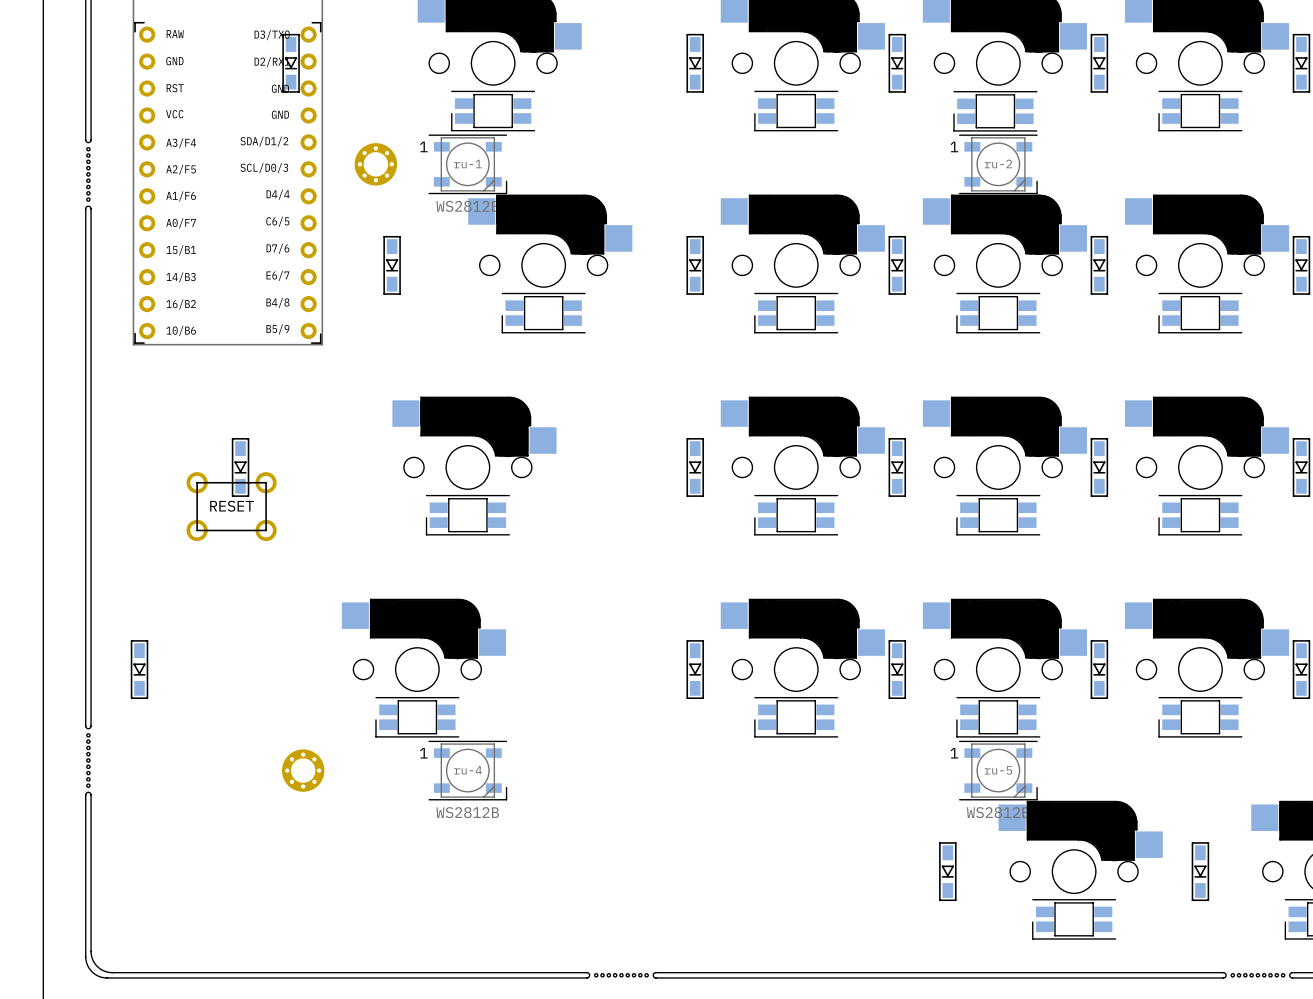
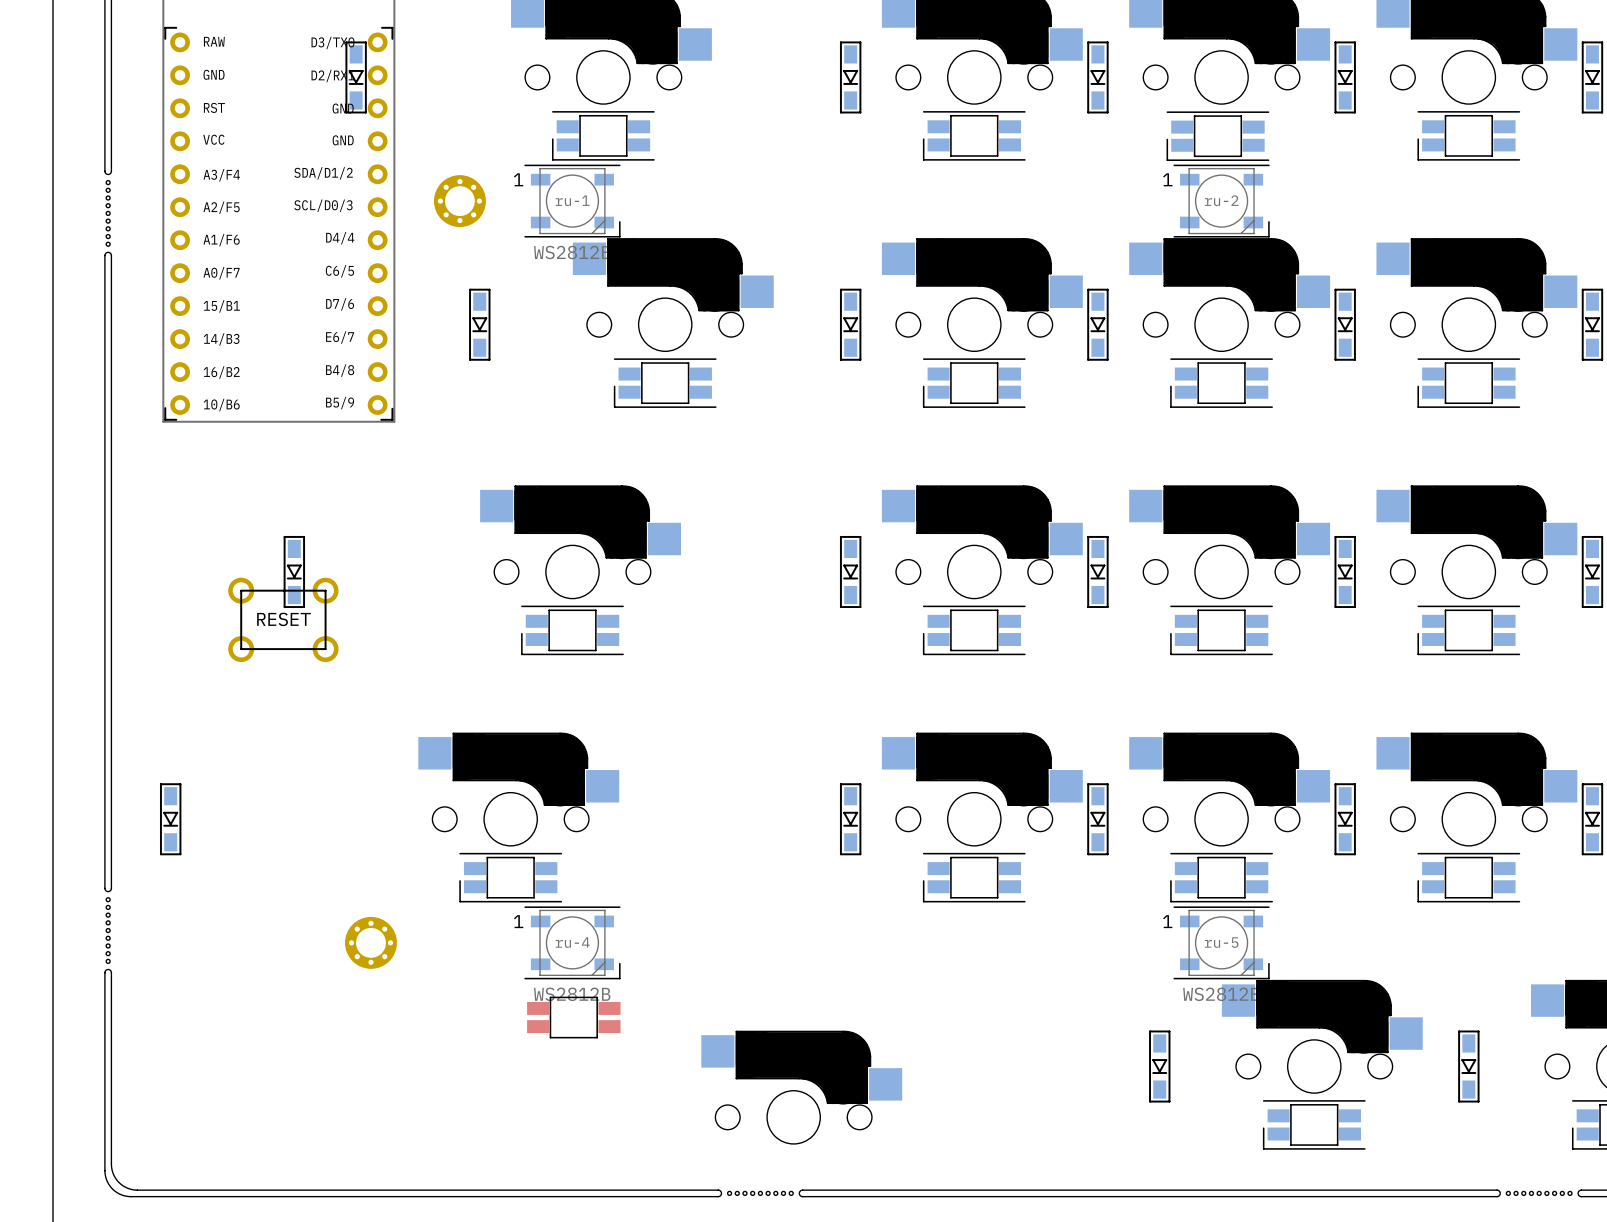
part: none -> (573, 1017)
part: none -> (801, 1087)

